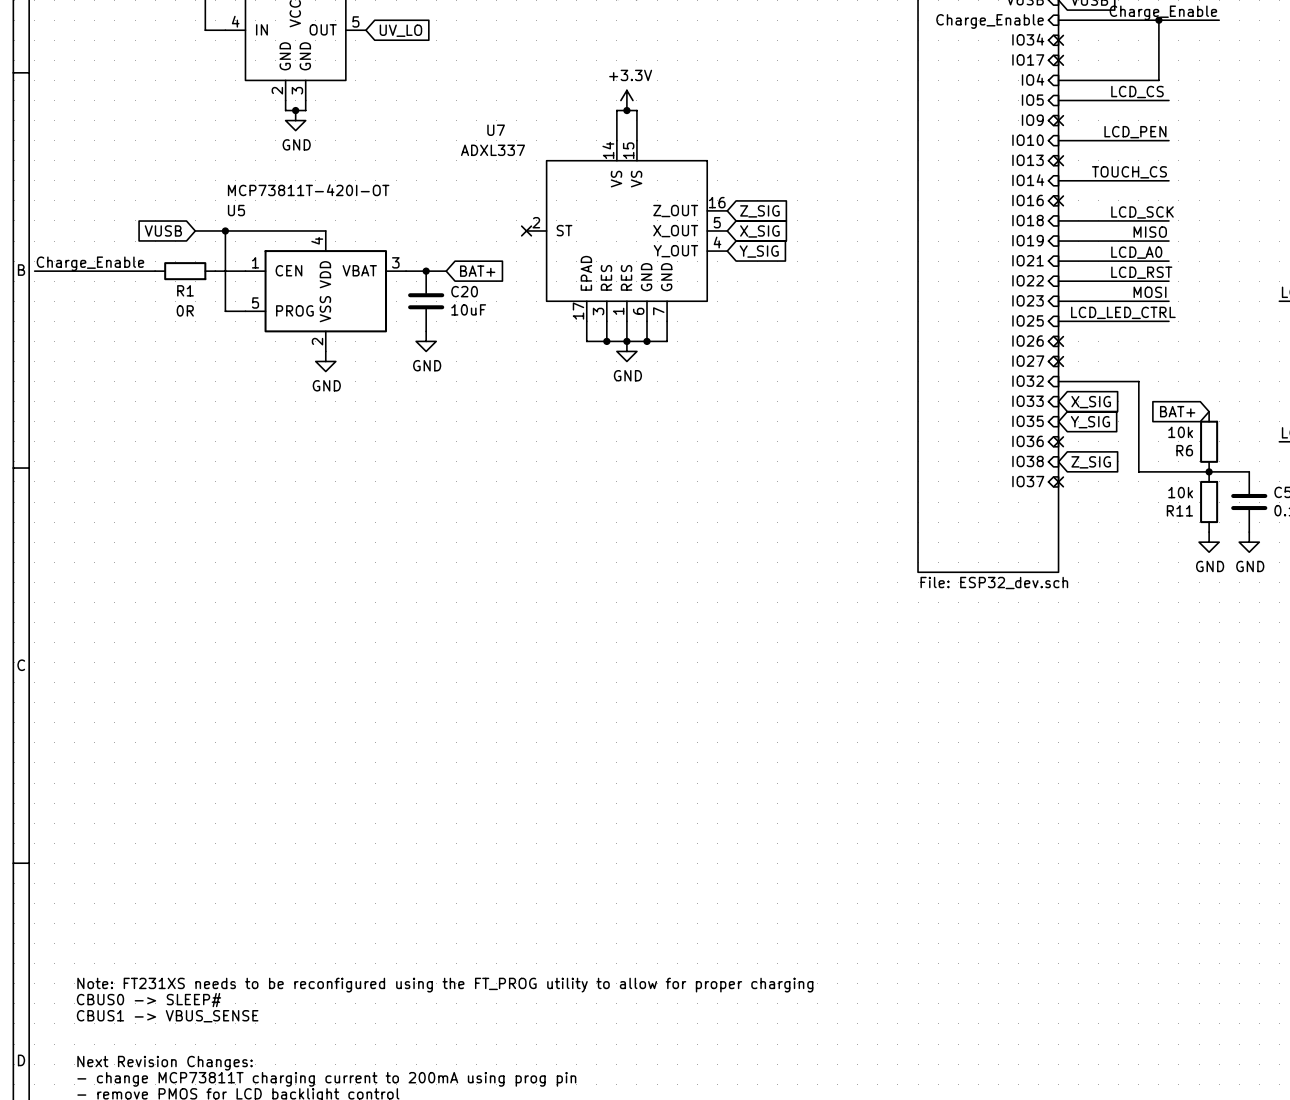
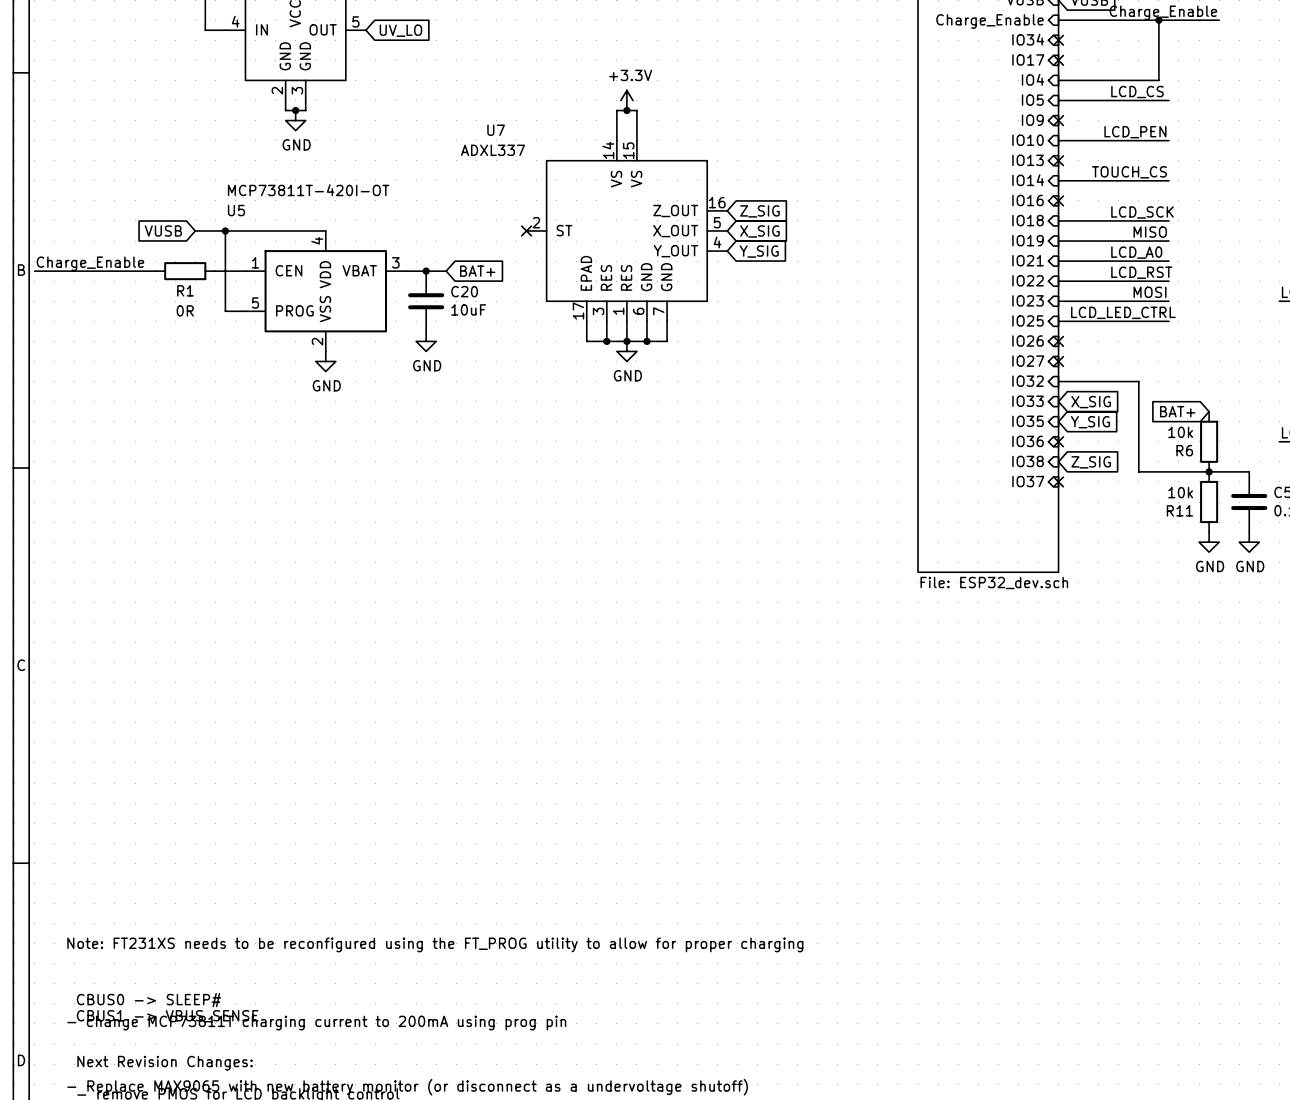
text position: Note: FT231XS needs to be reconfigured using the FT_PROG utility to allow for proper charging (445, 985) -> Note: FT231XS needs to be reconfigured using the FT_PROG utility to allow for proper charging (435, 944)
text position: - change MCP73811T charging current to 200mA using prog pin (326, 1079) -> - change MCP73811T charging current to 200mA using prog pin (316, 1023)
text: none -> - Replace MAX9065 with new battery monitor (or disconnect as a undervoltage shutoff) (407, 1087)

